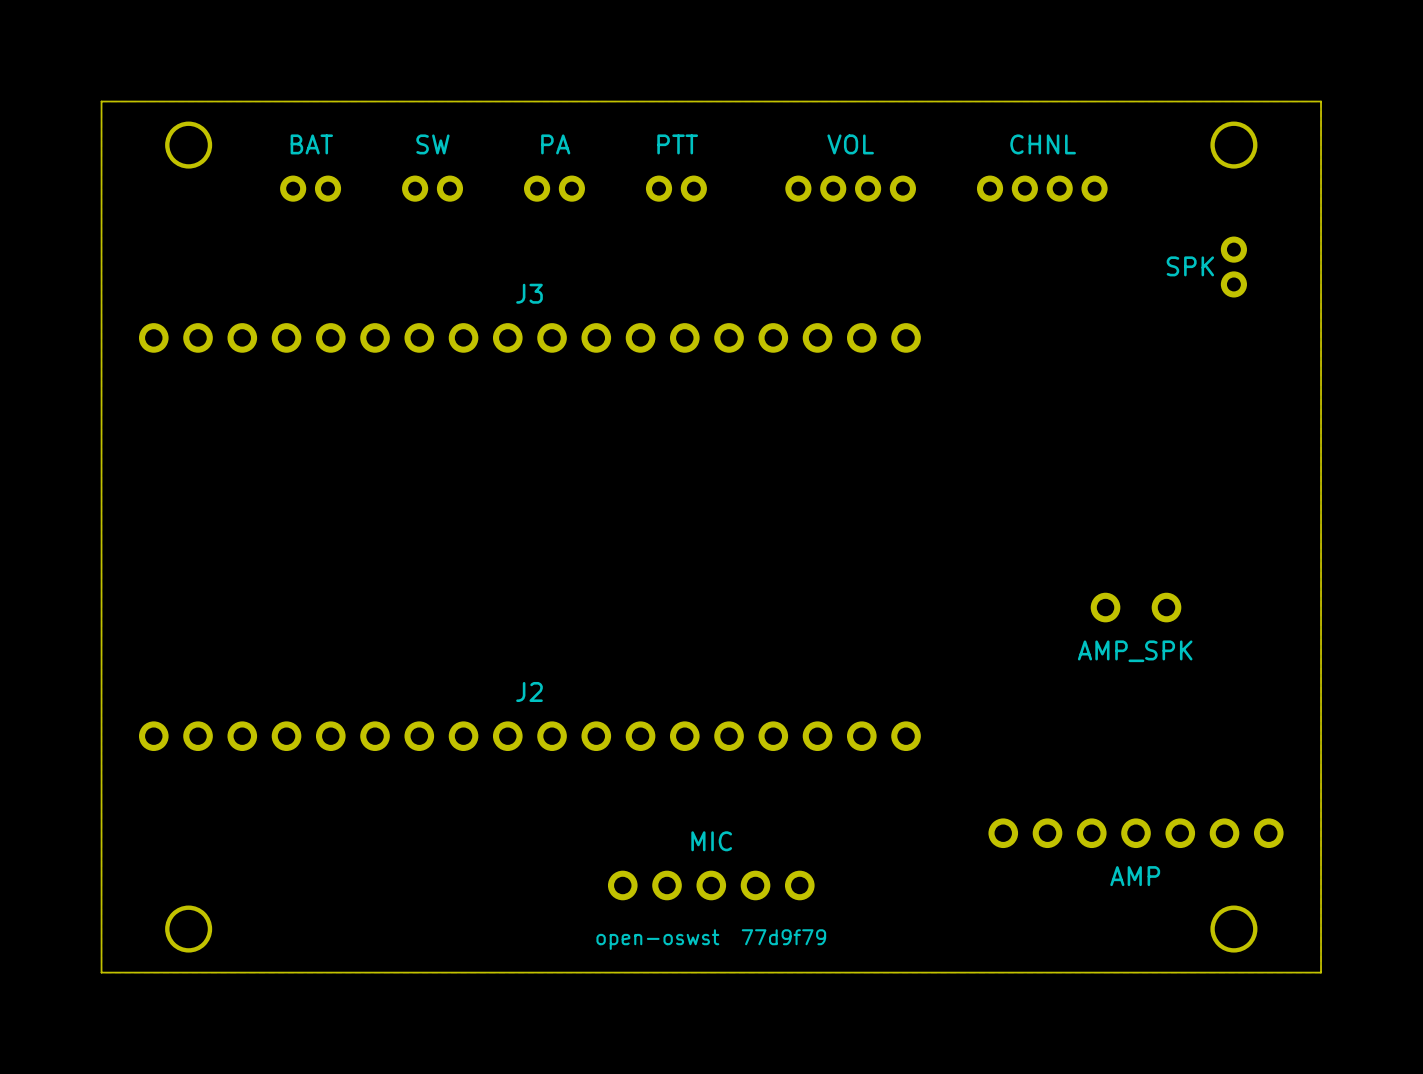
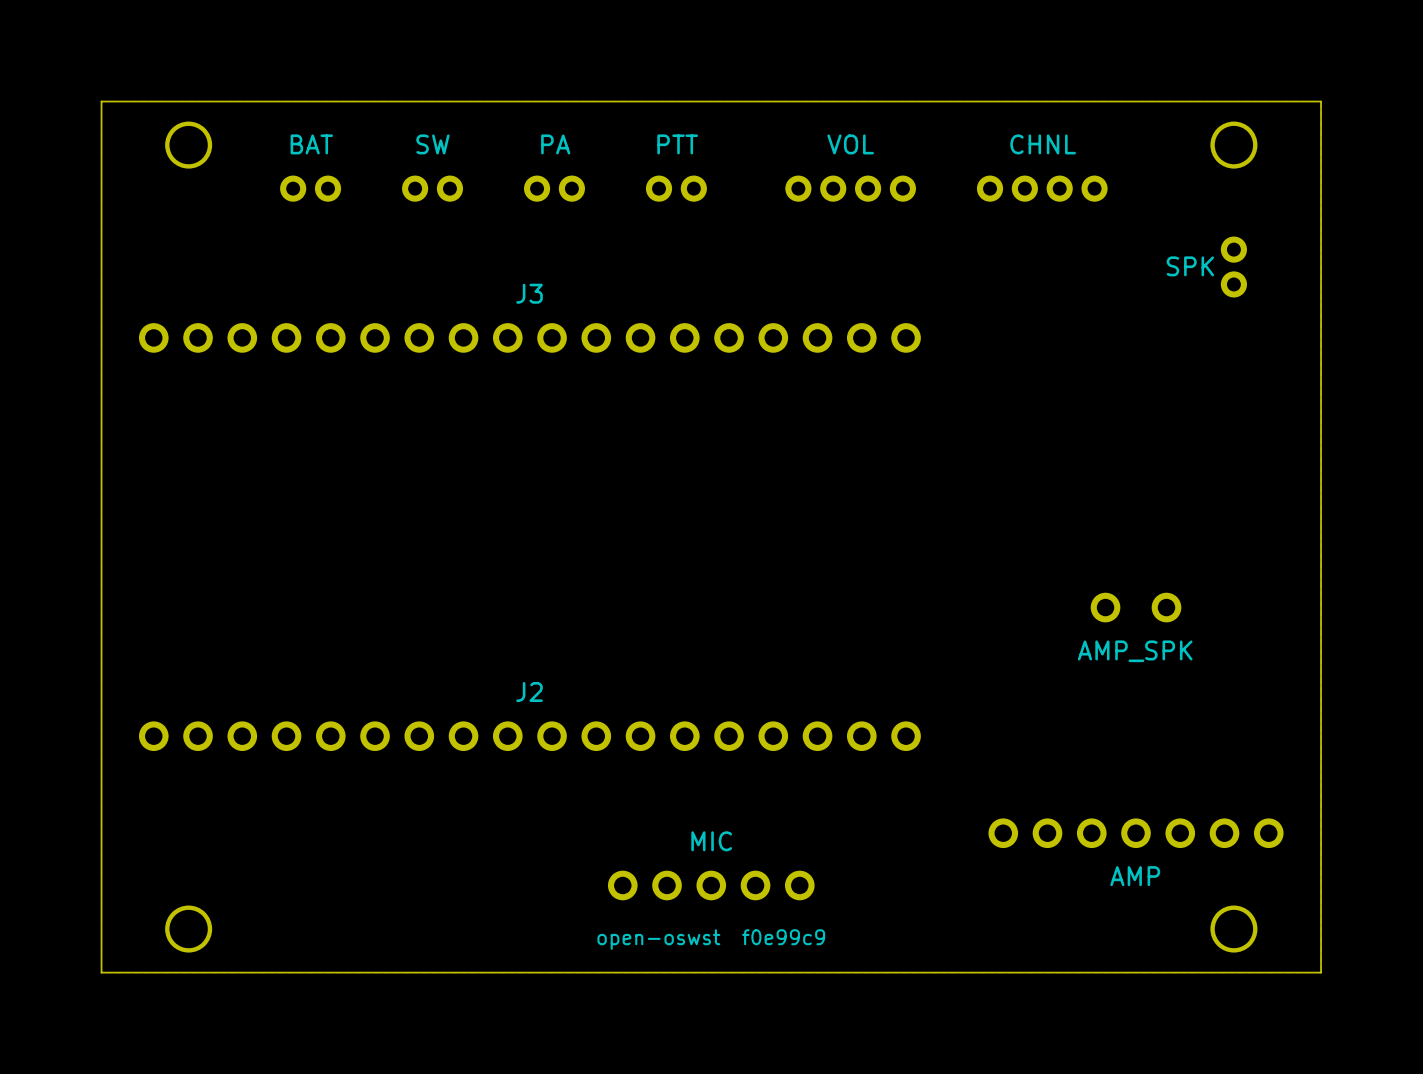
text: open-oswst 77d9f79 (711, 939) -> open-oswst f0e99c9 (711, 939)

